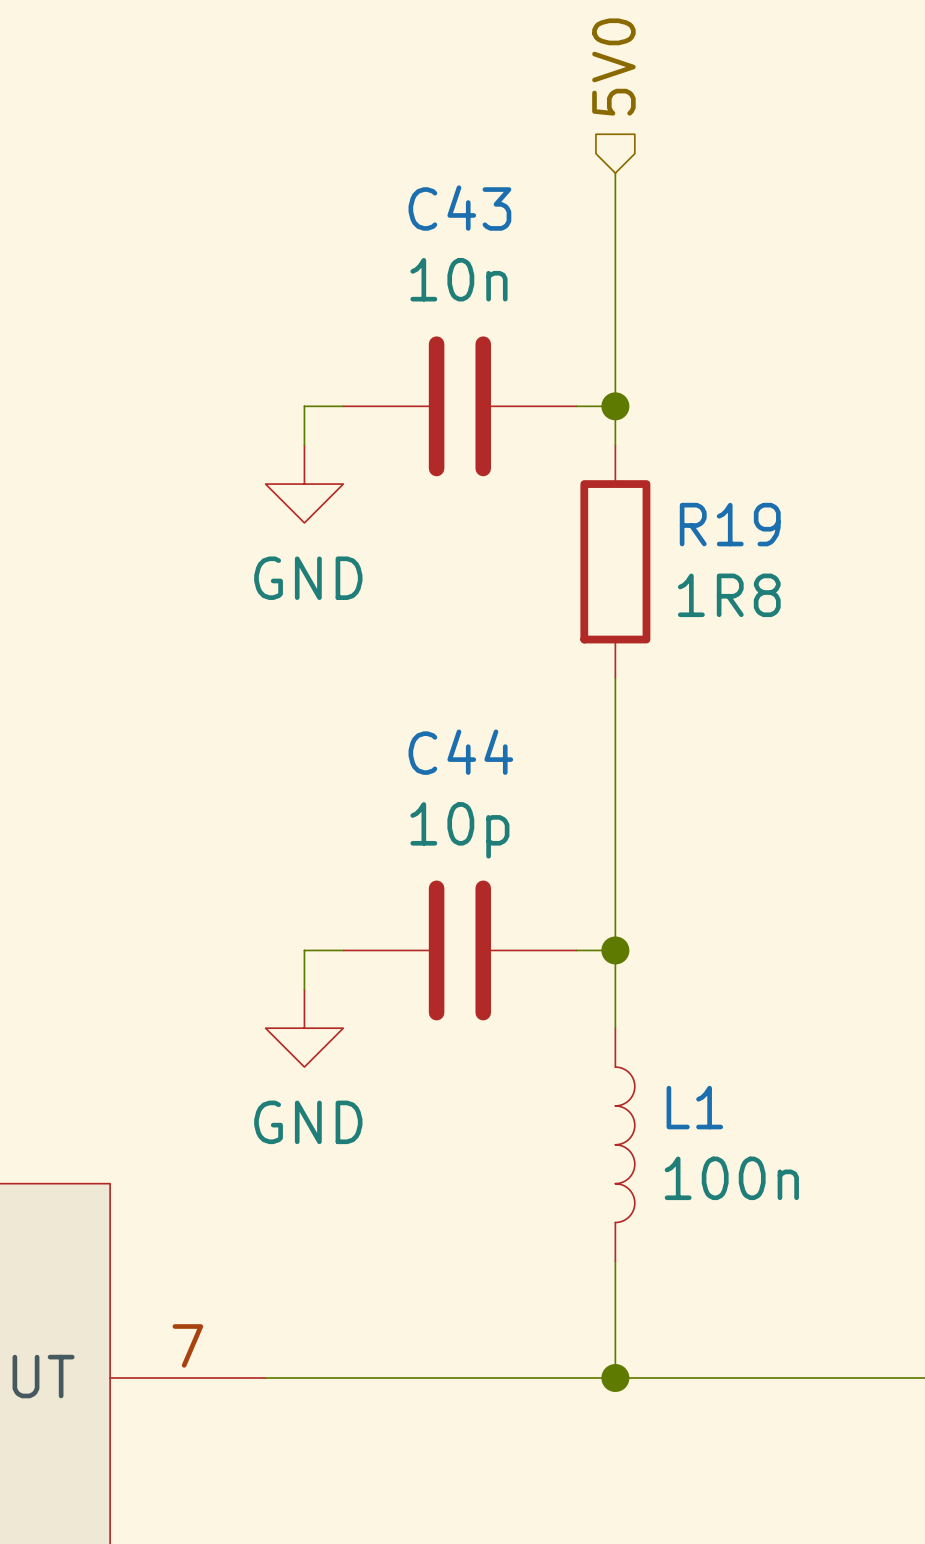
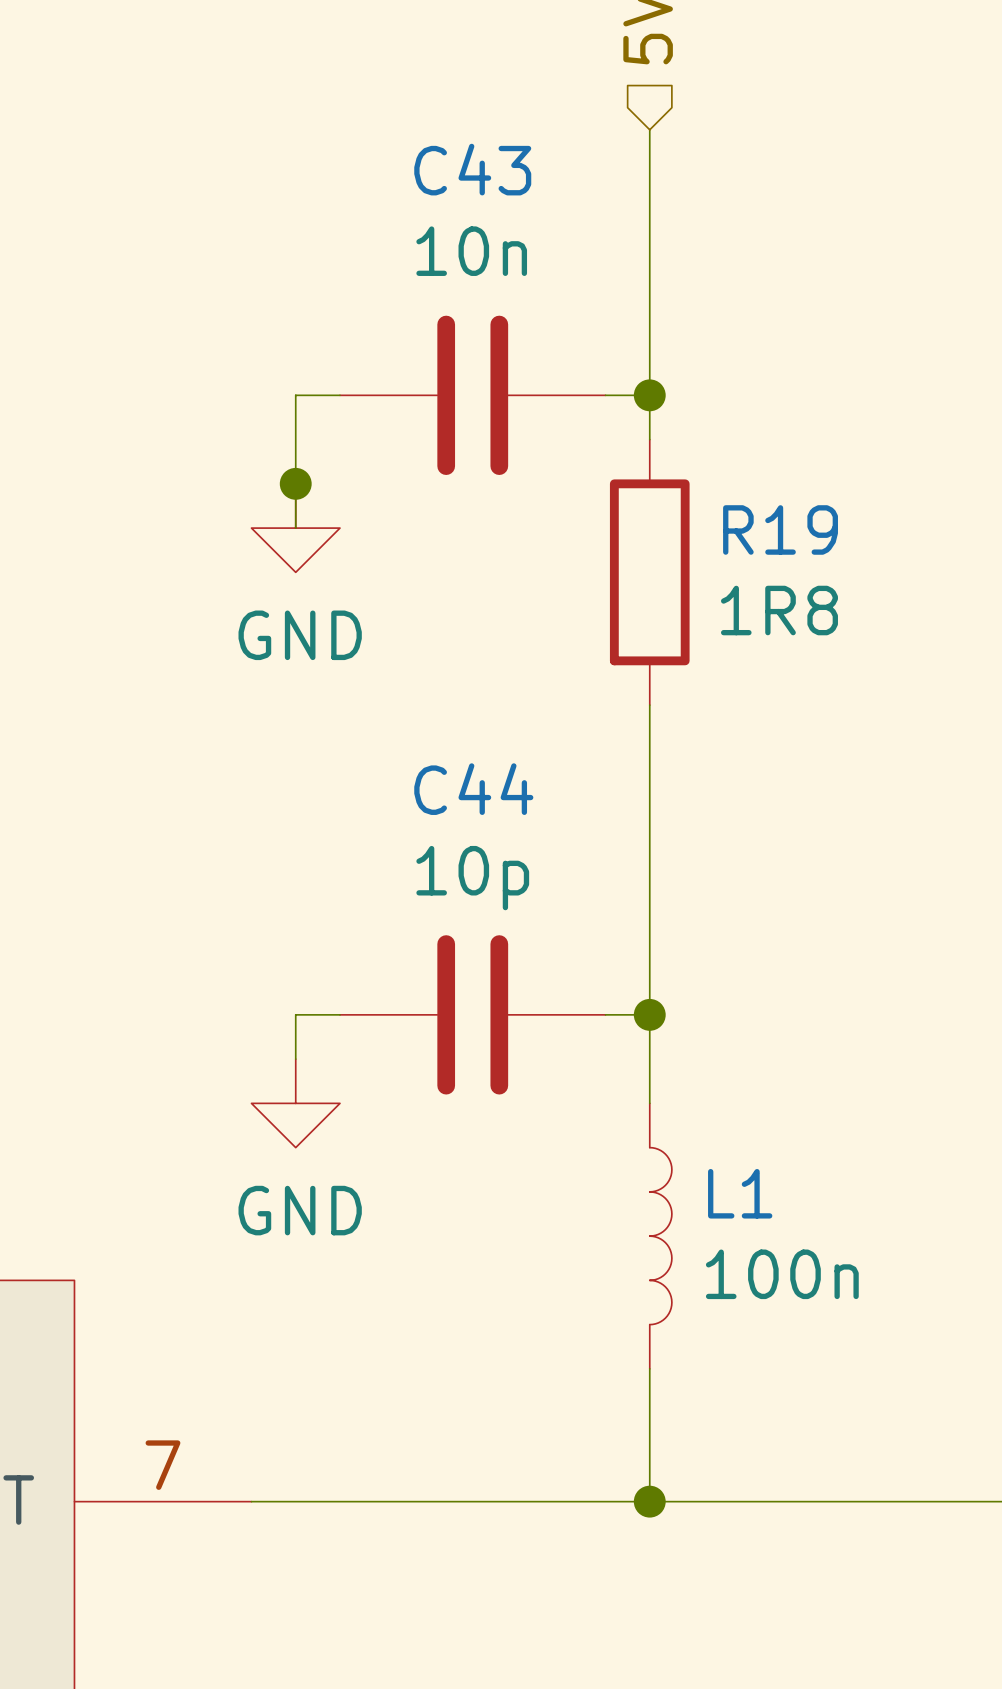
power symbol position: GND (304, 484) -> GND (295, 528)
junction: none -> (295, 483)

